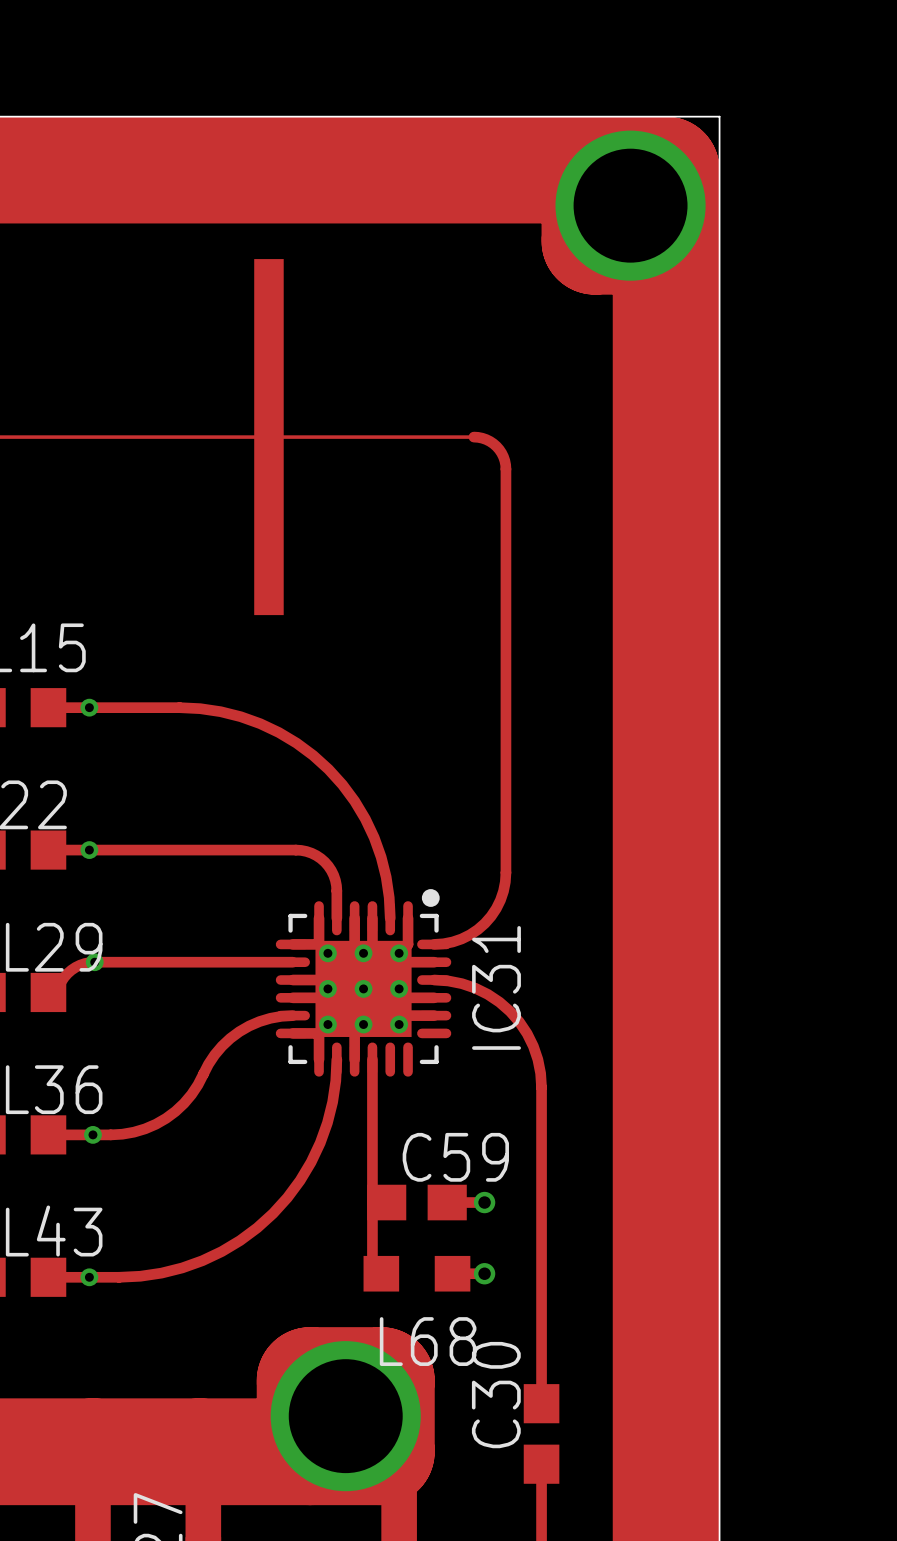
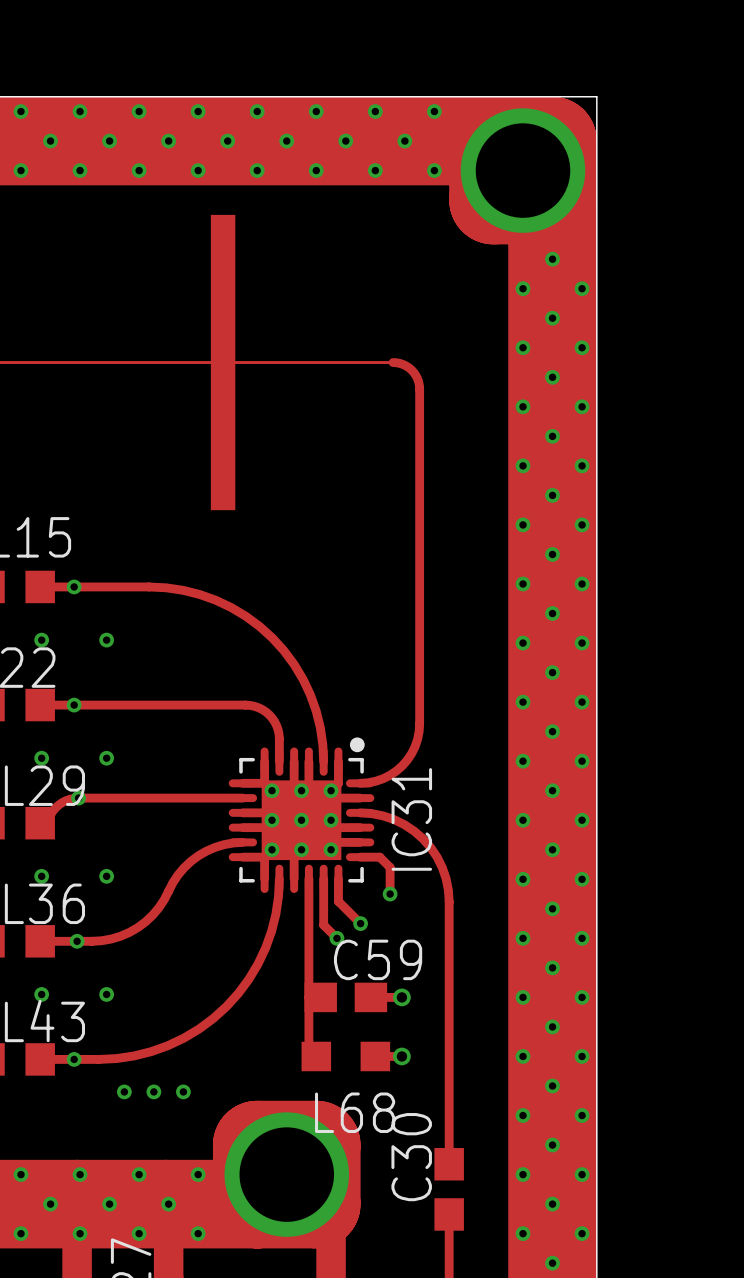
via: none -> (20, 111)
via: none -> (80, 111)
via: none -> (139, 111)
via: none -> (198, 111)
via: none -> (257, 111)
via: none -> (316, 111)
via: none -> (375, 111)
via: none -> (434, 111)
via: none -> (50, 141)
via: none -> (109, 141)
via: none -> (168, 141)
via: none -> (227, 141)
via: none -> (286, 141)
via: none -> (345, 141)
via: none -> (404, 141)
via: none -> (20, 170)
via: none -> (80, 170)
via: none -> (139, 170)
via: none -> (198, 170)
via: none -> (257, 170)
via: none -> (316, 170)
via: none -> (375, 170)
via: none -> (434, 170)
via: none -> (552, 259)
via: none -> (523, 288)
via: none -> (582, 288)
via: none -> (552, 318)
via: none -> (523, 347)
via: none -> (582, 347)
via: none -> (552, 377)
via: none -> (523, 406)
via: none -> (582, 406)
via: none -> (552, 436)
via: none -> (523, 465)
via: none -> (582, 465)
via: none -> (552, 495)
via: none -> (523, 524)
via: none -> (582, 524)
via: none -> (552, 554)
via: none -> (523, 584)
via: none -> (582, 584)
via: none -> (552, 613)
via: none -> (41, 640)
via: none -> (106, 640)
via: none -> (523, 643)
via: none -> (582, 643)
via: none -> (552, 672)
via: none -> (523, 702)
via: none -> (582, 702)
via: none -> (552, 731)
via: none -> (41, 758)
via: none -> (106, 758)
via: none -> (523, 761)
via: none -> (582, 761)
via: none -> (552, 790)
via: none -> (523, 820)
via: none -> (582, 820)
via: none -> (552, 849)
track: none -> (360, 857) (379, 857) (390, 867) (390, 894)
via: none -> (41, 876)
via: none -> (106, 876)
track: none -> (323, 878) (323, 925) (336, 938)
track: none -> (338, 878) (338, 901) (360, 923)
via: none -> (523, 879)
via: none -> (582, 879)
via: none -> (390, 894)
via: none -> (552, 908)
via: none -> (360, 923)
via: none -> (336, 938)
via: none -> (523, 938)
via: none -> (582, 938)
via: none -> (552, 967)
via: none -> (41, 994)
via: none -> (106, 994)
via: none -> (523, 997)
via: none -> (582, 997)
via: none -> (552, 1026)
via: none -> (523, 1056)
via: none -> (582, 1056)
via: none -> (552, 1086)
via: none -> (124, 1091)
via: none -> (153, 1091)
via: none -> (183, 1091)
via: none -> (523, 1115)
via: none -> (582, 1115)
via: none -> (552, 1145)
via: none -> (20, 1174)
via: none -> (80, 1174)
via: none -> (139, 1174)
via: none -> (198, 1174)
via: none -> (523, 1174)
via: none -> (582, 1174)
via: none -> (50, 1204)
via: none -> (109, 1204)
via: none -> (168, 1204)
via: none -> (552, 1204)
via: none -> (20, 1233)
via: none -> (80, 1233)
via: none -> (139, 1233)
via: none -> (198, 1233)
via: none -> (523, 1233)
via: none -> (582, 1233)
via: none -> (552, 1263)

